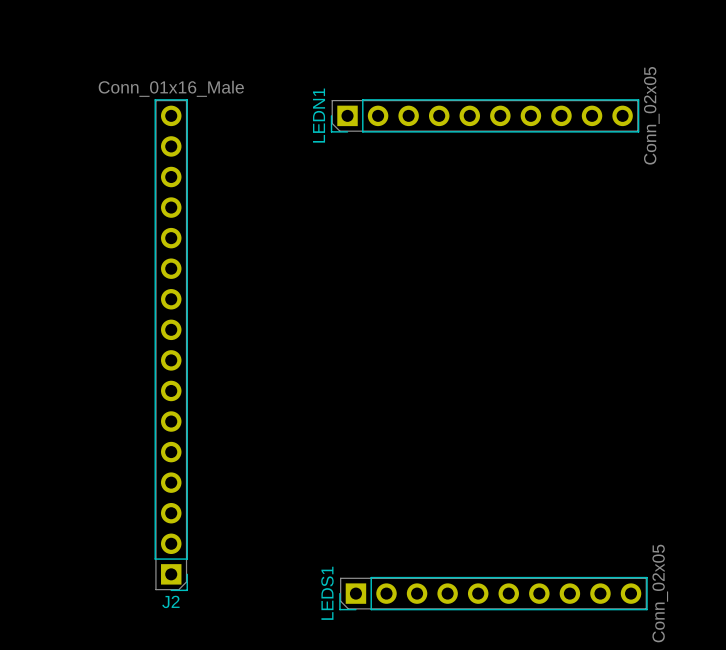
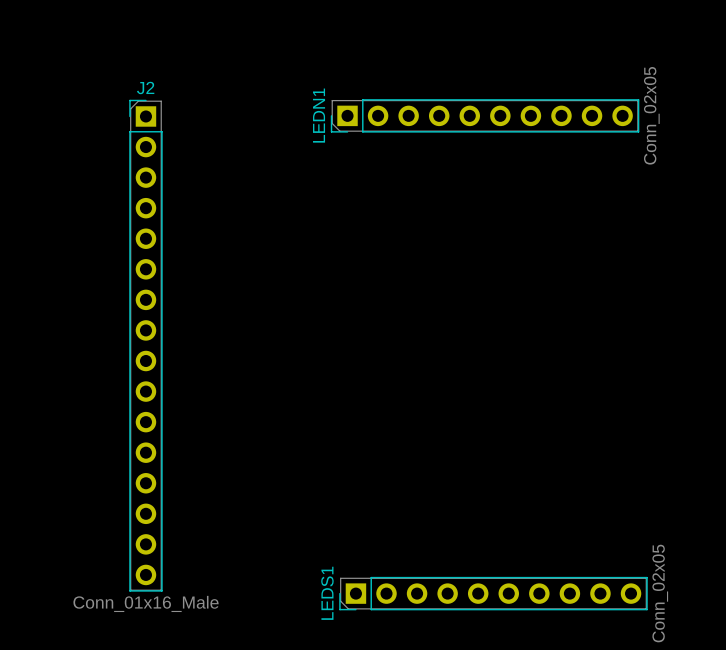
J2 rotation: 0° (171, 345) -> 180° (145, 345)

